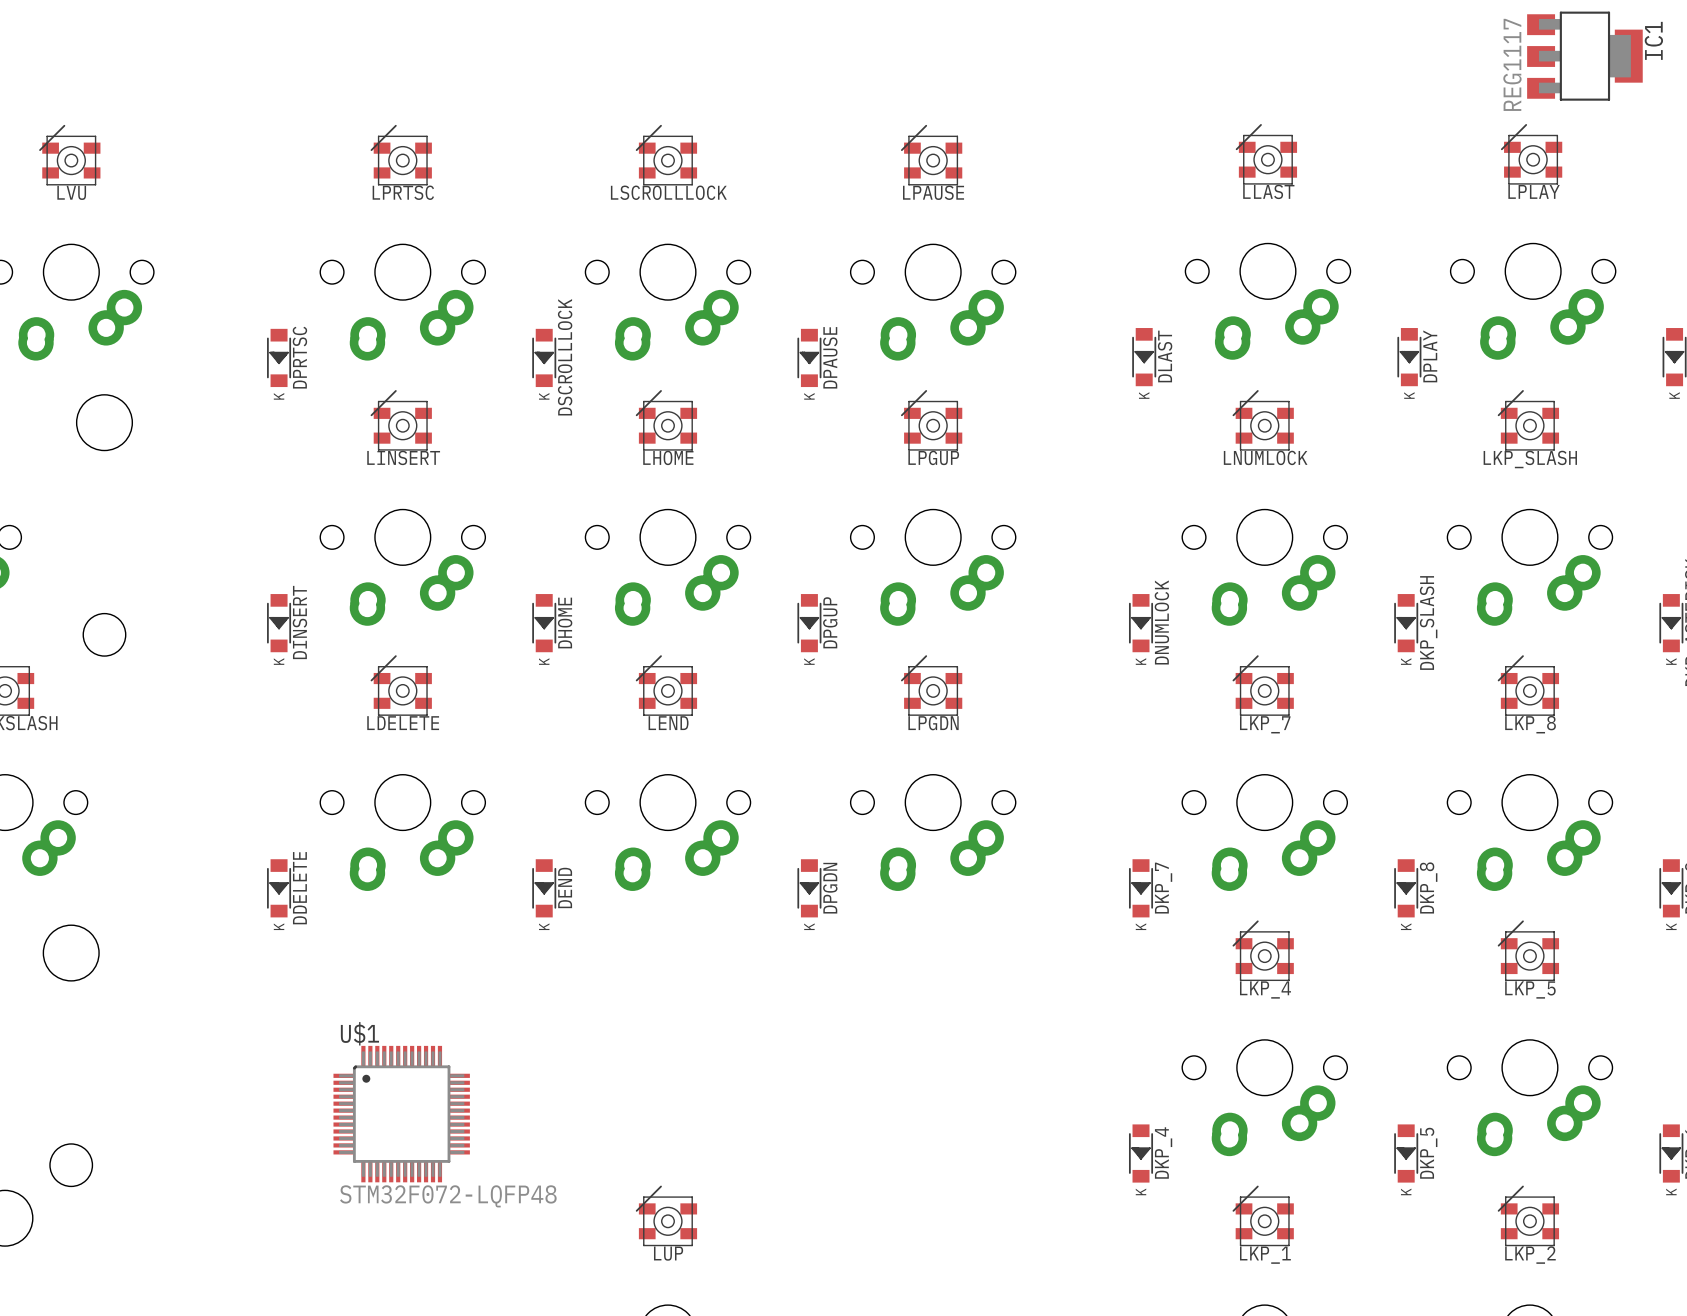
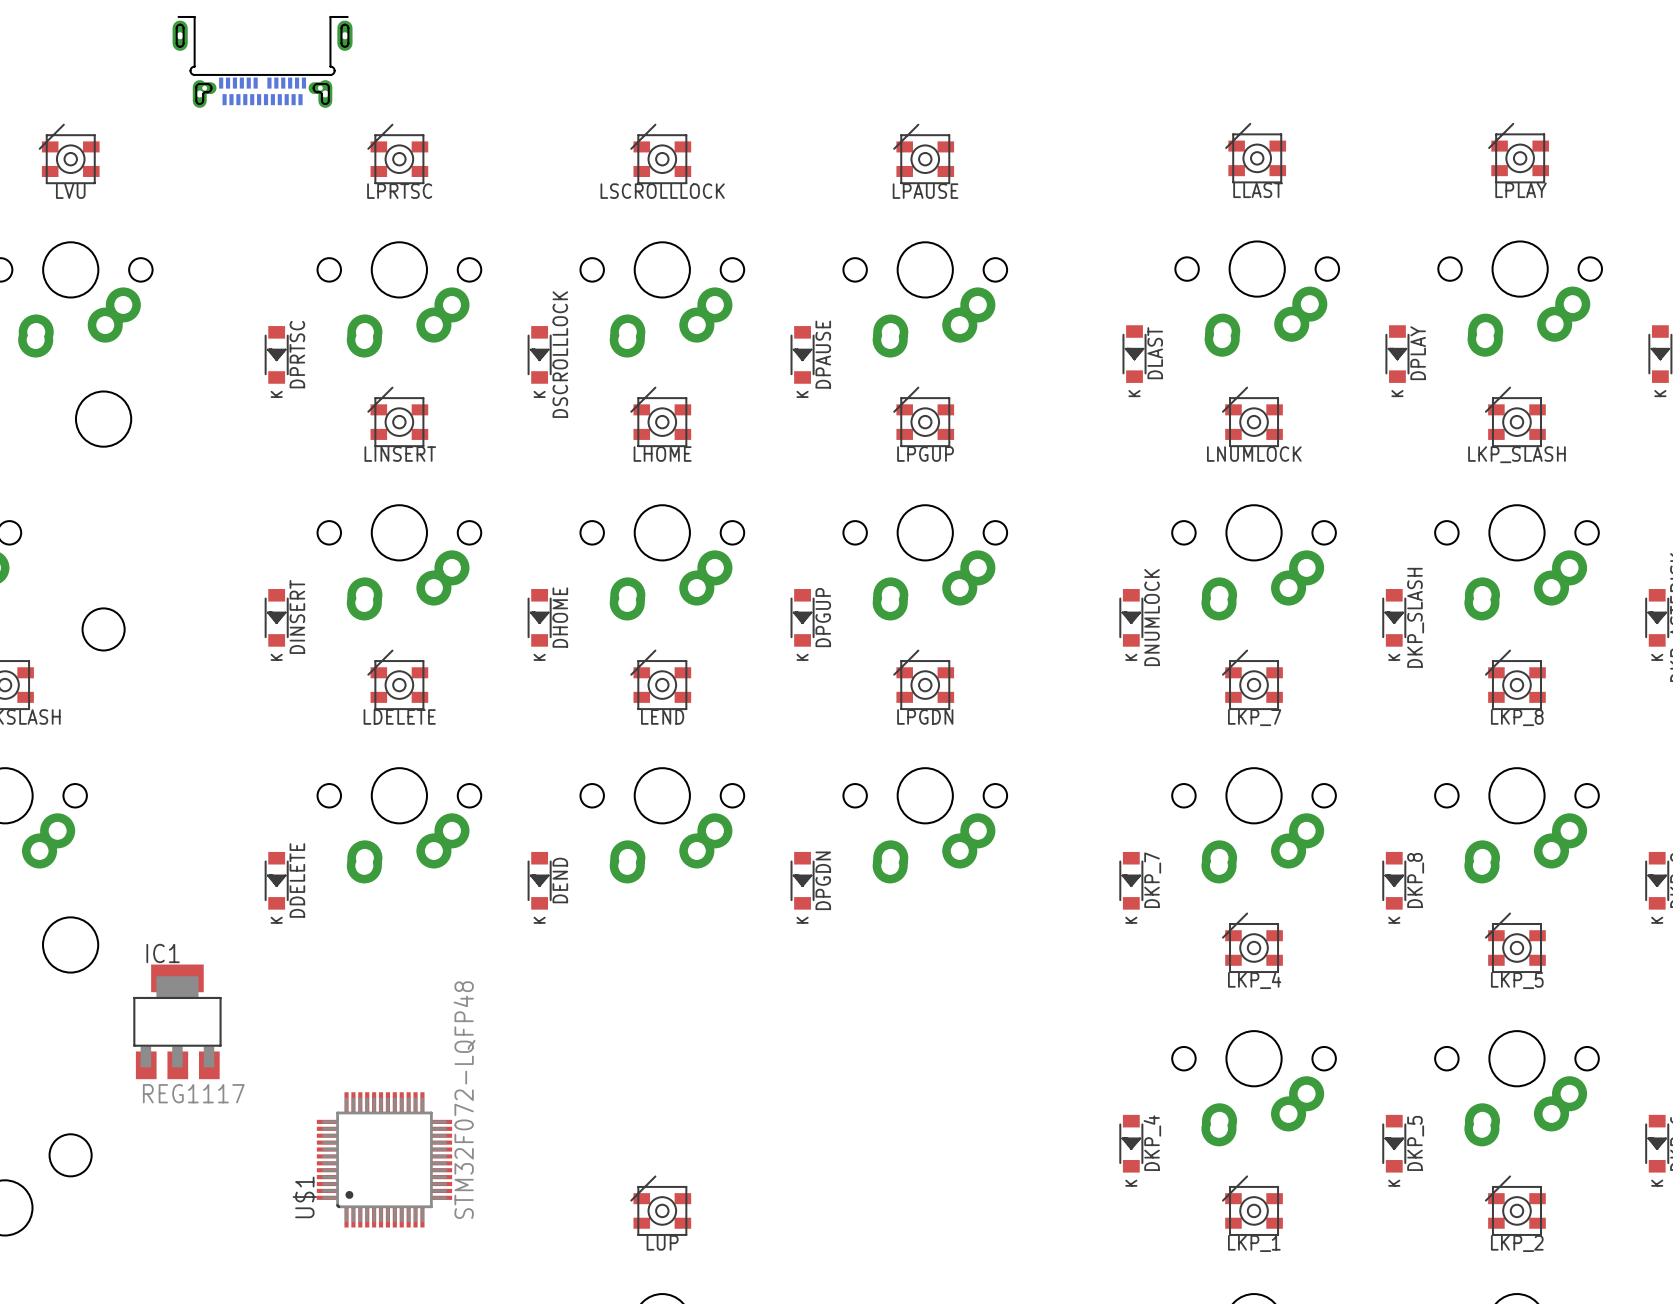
IC1 rotation: 0° (1584, 56) -> 90° counterclockwise (177, 1021)
IC1 position: (1584, 56) -> (177, 1021)
part: none -> (262, 62)
U$1 rotation: 0° (401, 1114) -> 90° counterclockwise (384, 1159)

